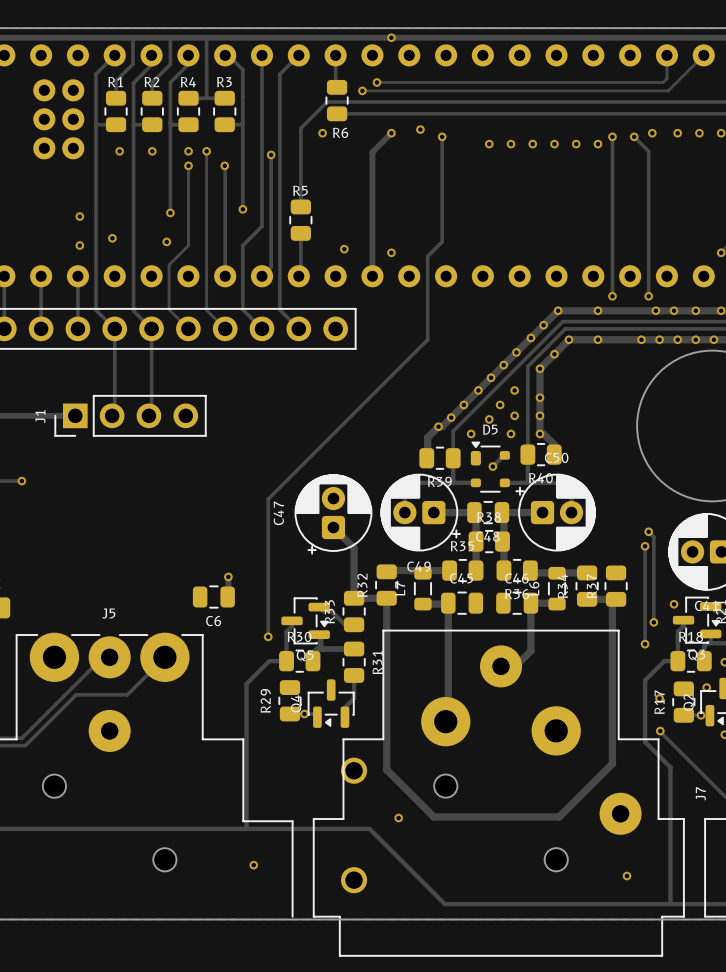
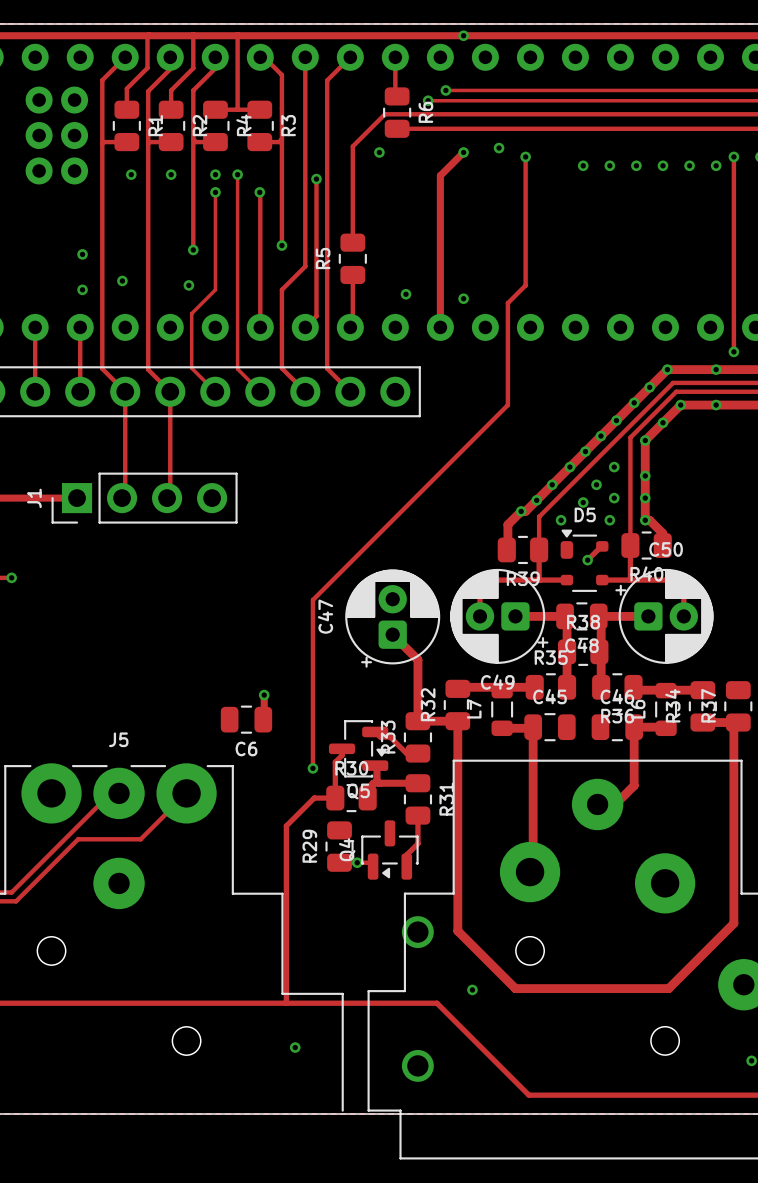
R1 name rotation: 0° (115, 82) -> 90° counterclockwise (155, 125)
R1 name position: R1 (115, 82) -> R1 (155, 125)
R2 name rotation: 0° (151, 82) -> 90° counterclockwise (199, 125)
R2 name position: R2 (151, 82) -> R2 (199, 125)
R4 name rotation: 0° (188, 82) -> 90° counterclockwise (243, 125)
R4 name position: R4 (188, 82) -> R4 (243, 125)
R3 name rotation: 0° (224, 82) -> 90° counterclockwise (288, 125)
R3 name position: R3 (224, 82) -> R3 (288, 125)
R6 name rotation: 0° (340, 132) -> 90° counterclockwise (425, 112)
R6 name position: R6 (340, 132) -> R6 (425, 112)
R5 name rotation: 0° (300, 190) -> 90° counterclockwise (323, 258)
R5 name position: R5 (300, 190) -> R5 (323, 258)

